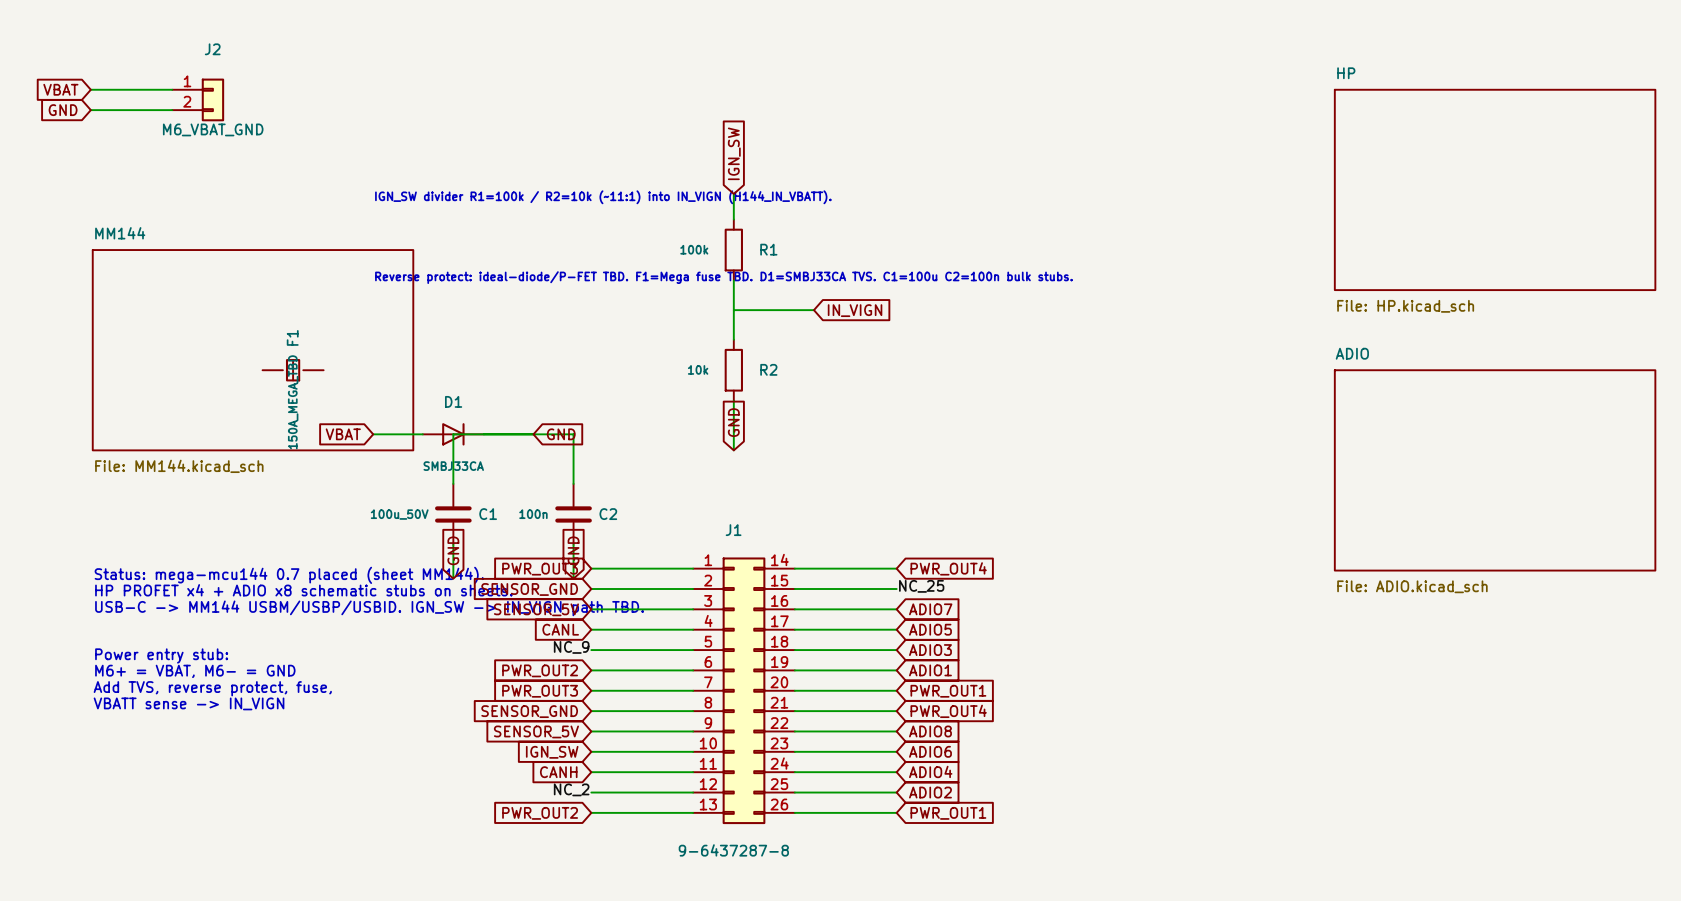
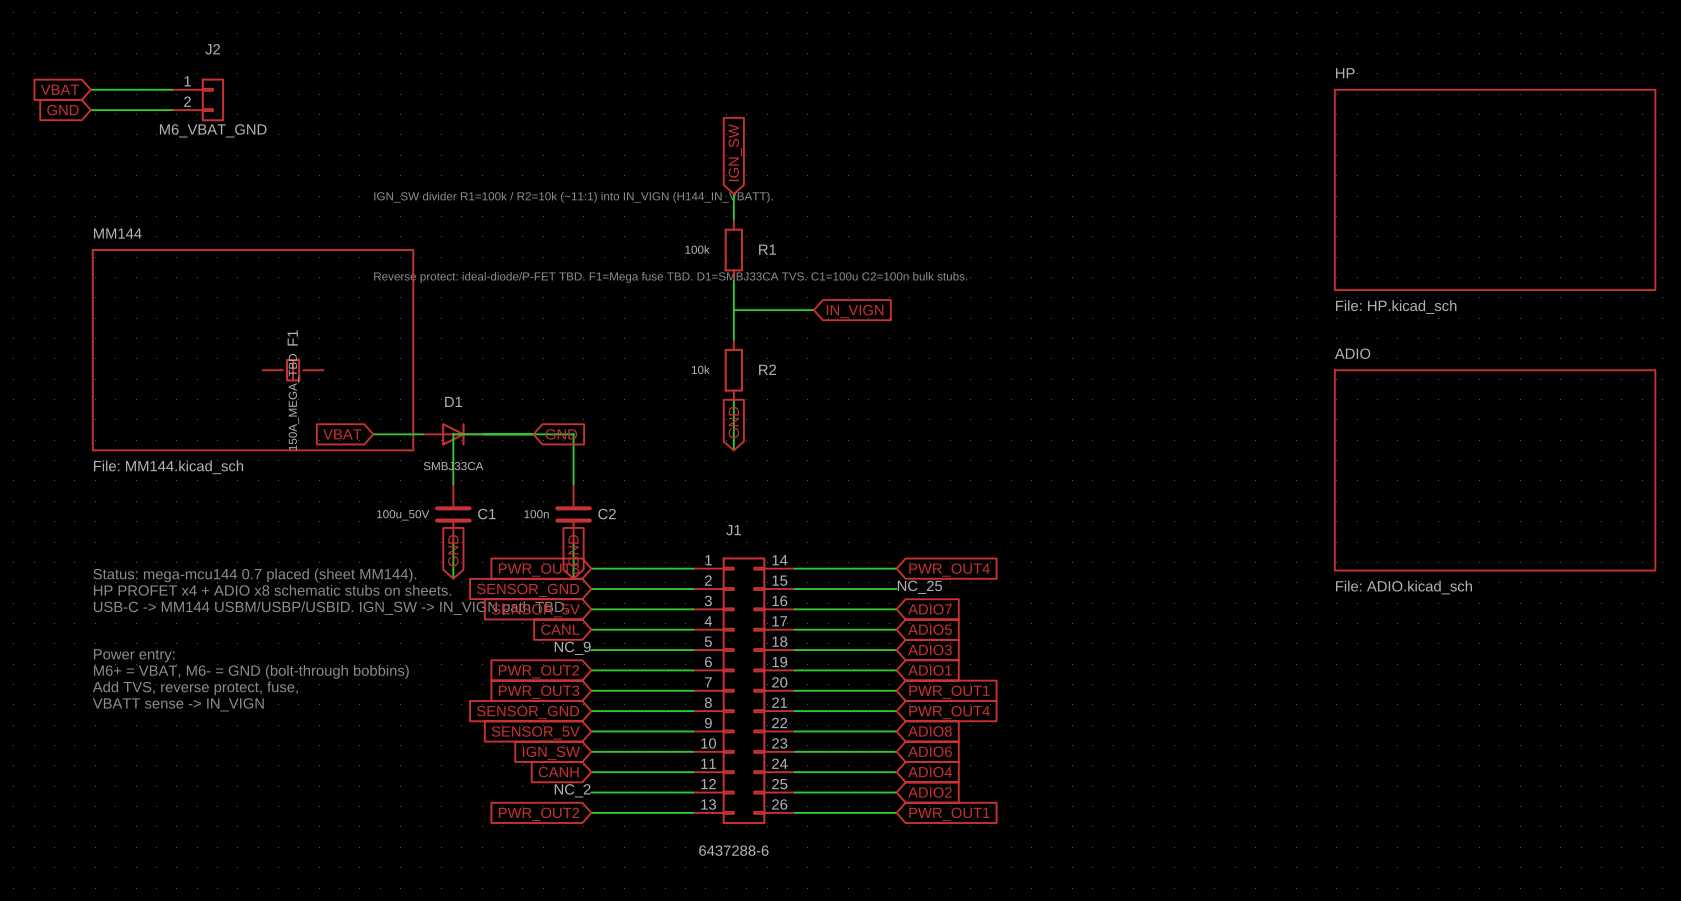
text: Power entry stub: (161, 655) -> Power entry: (134, 655)
text: M6+ = VBAT, M6- = GND (195, 671) -> M6+ = VBAT, M6- = GND (bolt-through bobbins) (251, 671)
J1 value: 9-6437287-8 (733, 850) -> 6437288-6 (733, 850)

